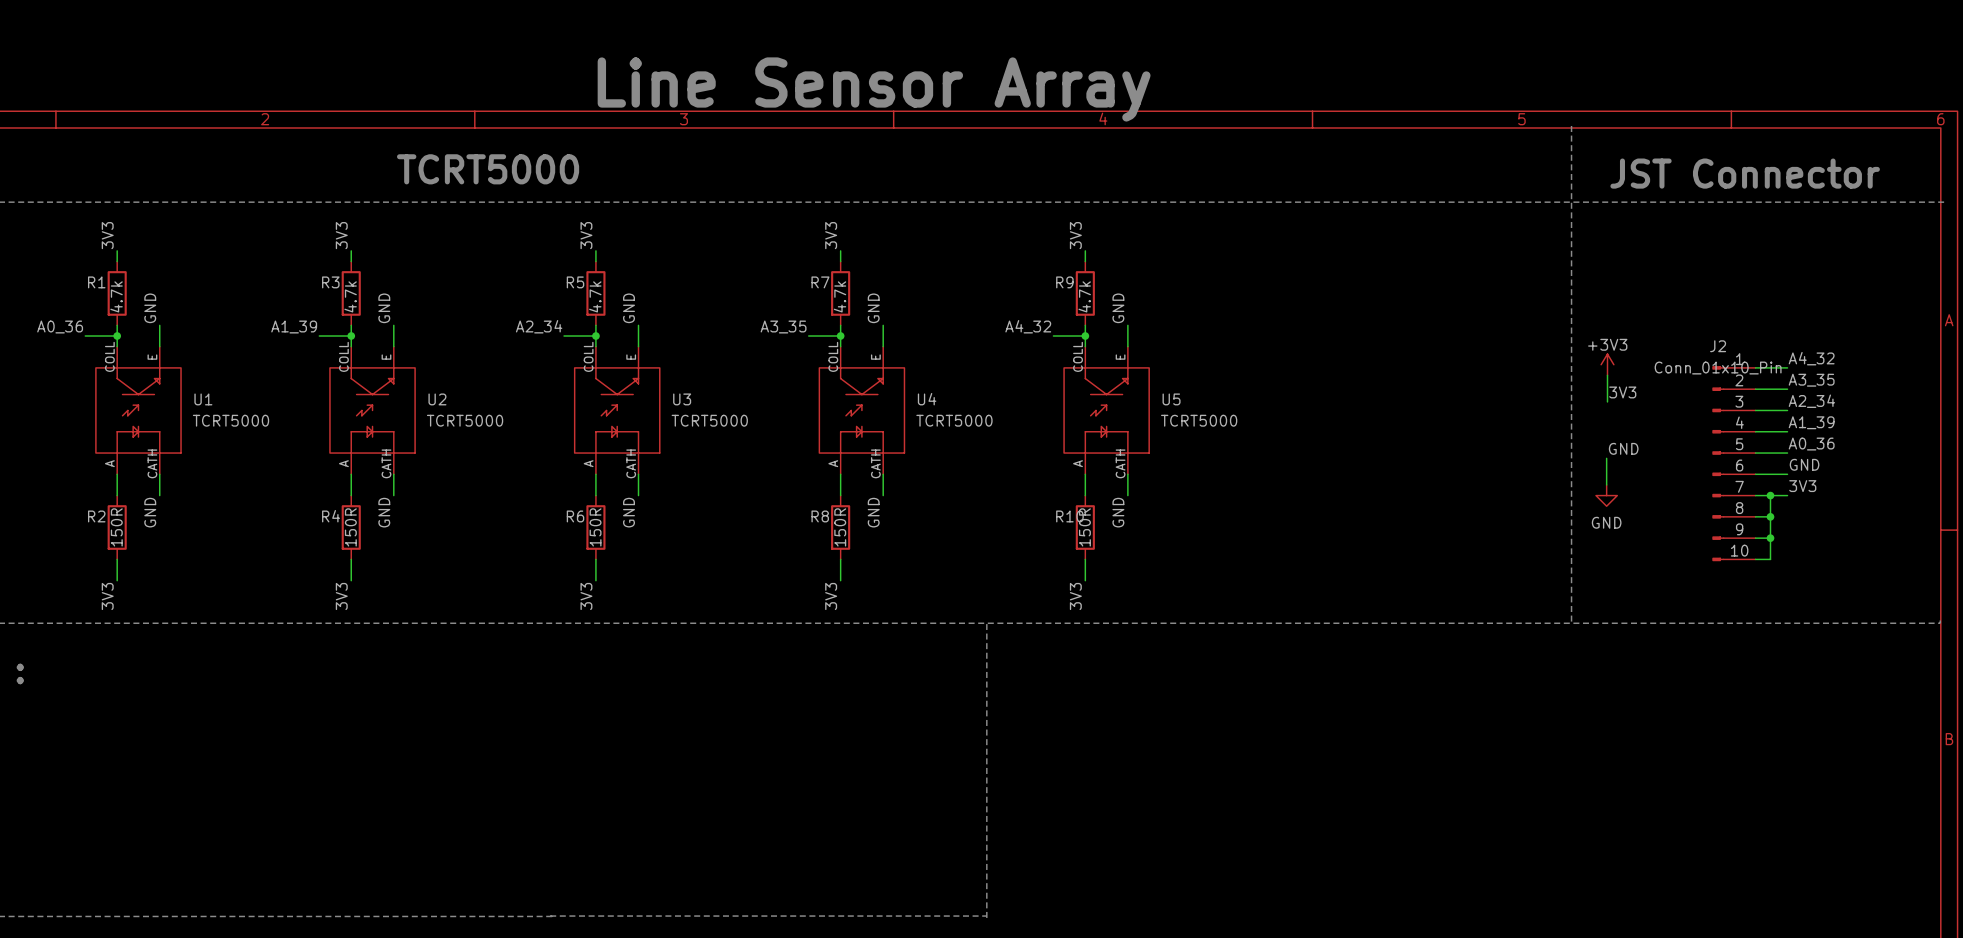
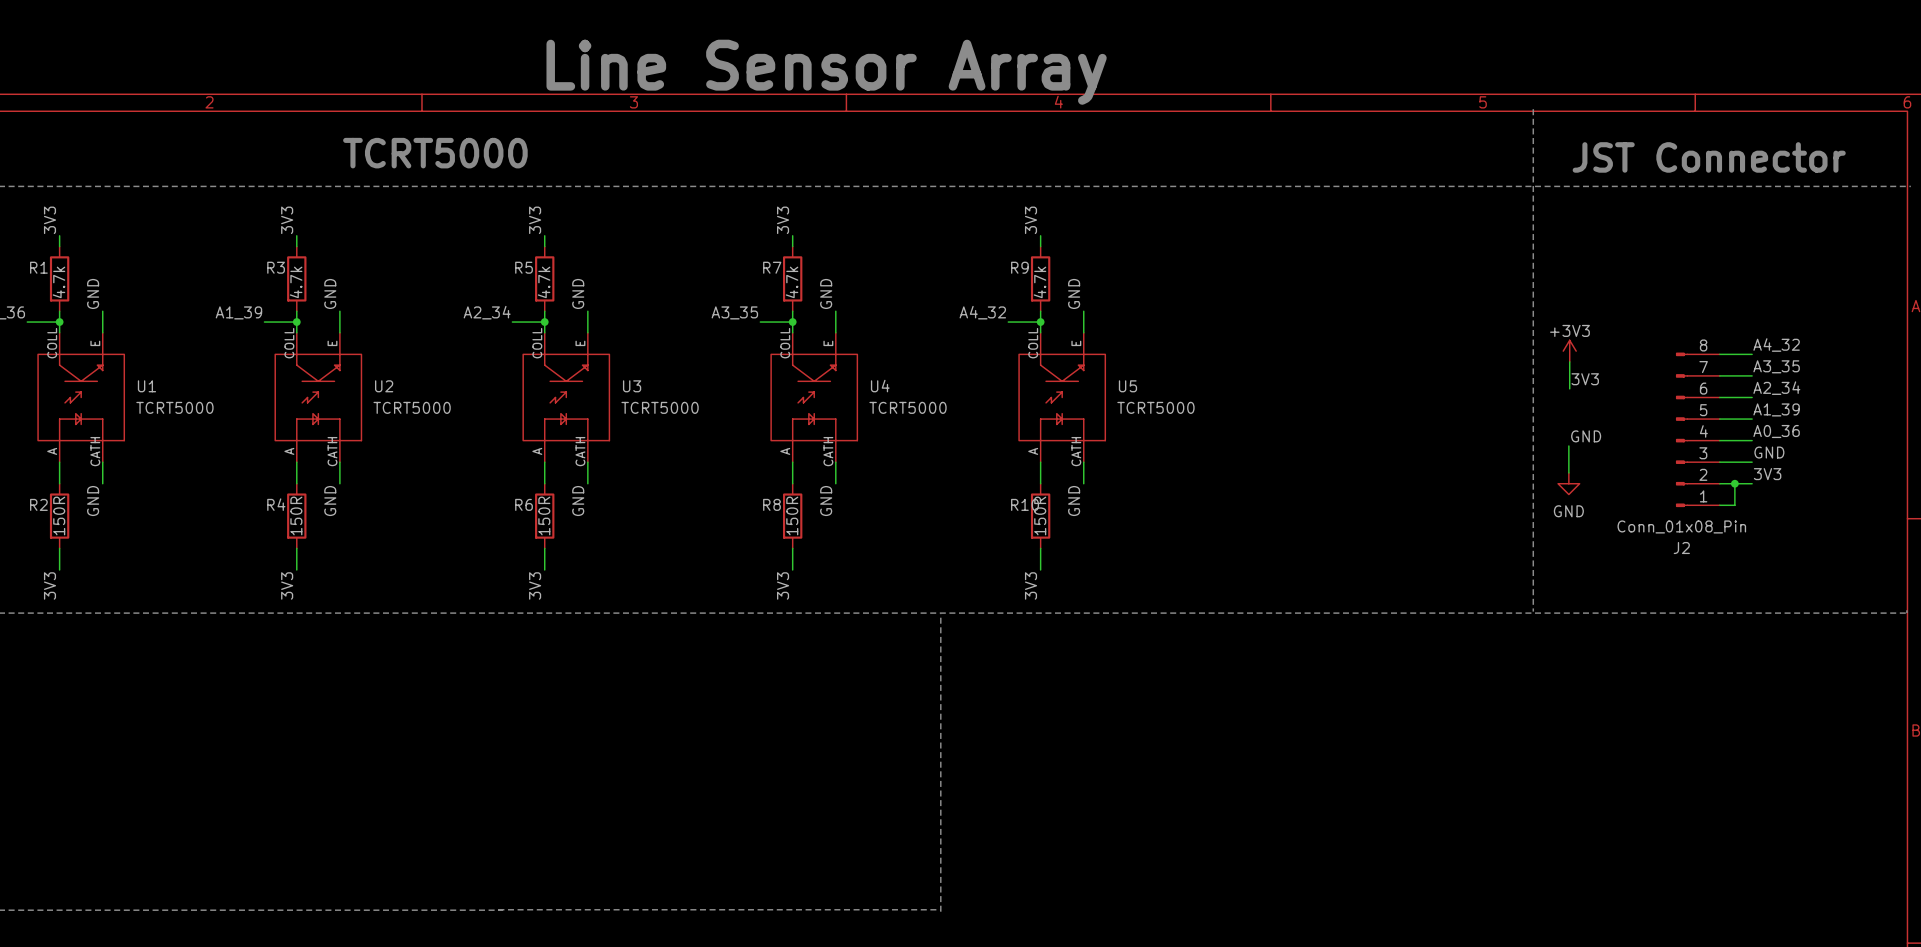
J2 name position: J2 (1718, 346) -> J2 (1681, 548)
J2 symbol: [1712, 366, 1756, 562] -> [1676, 352, 1720, 508]
J2 value: Conn_01x10_Pin (1718, 368) -> Conn_01x08_Pin (1681, 526)
wire: (1770, 516) (1770, 559) (1755, 559) -> none
junction: (1770, 516) -> none
wire: (1755, 538) (1770, 538) -> none
junction: (1770, 538) -> none

